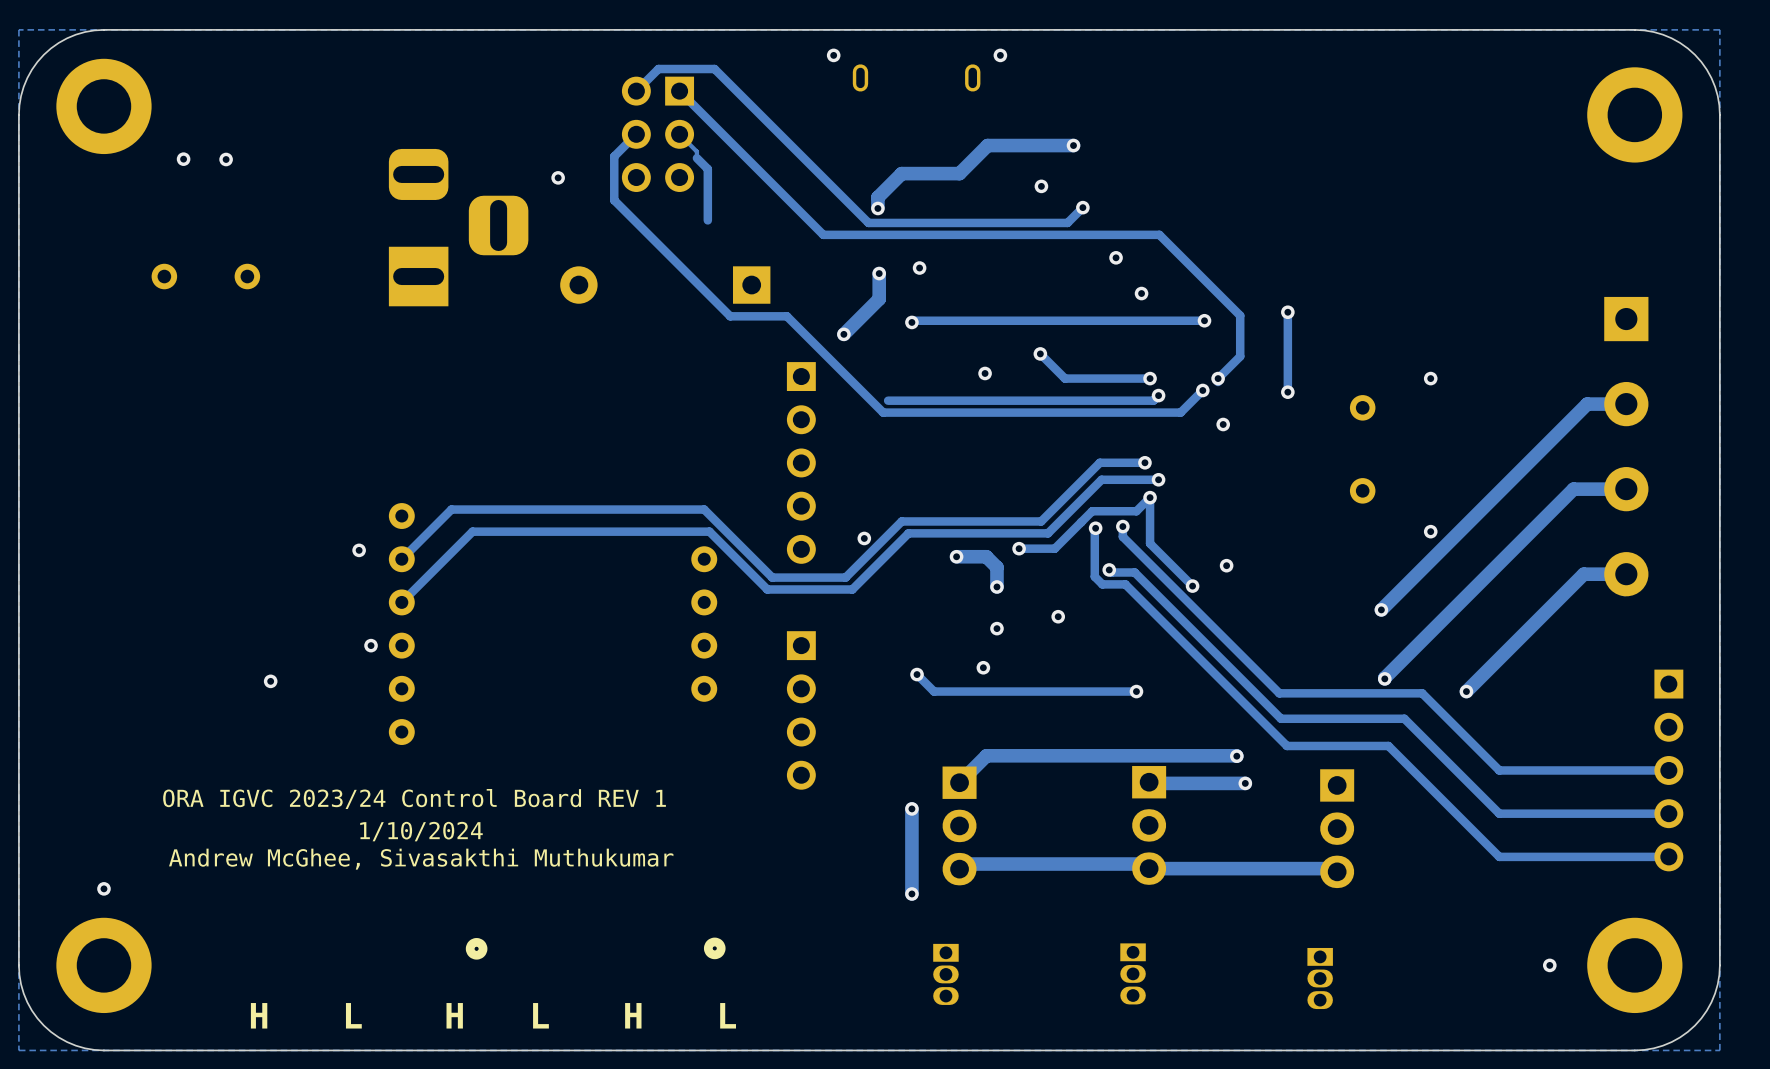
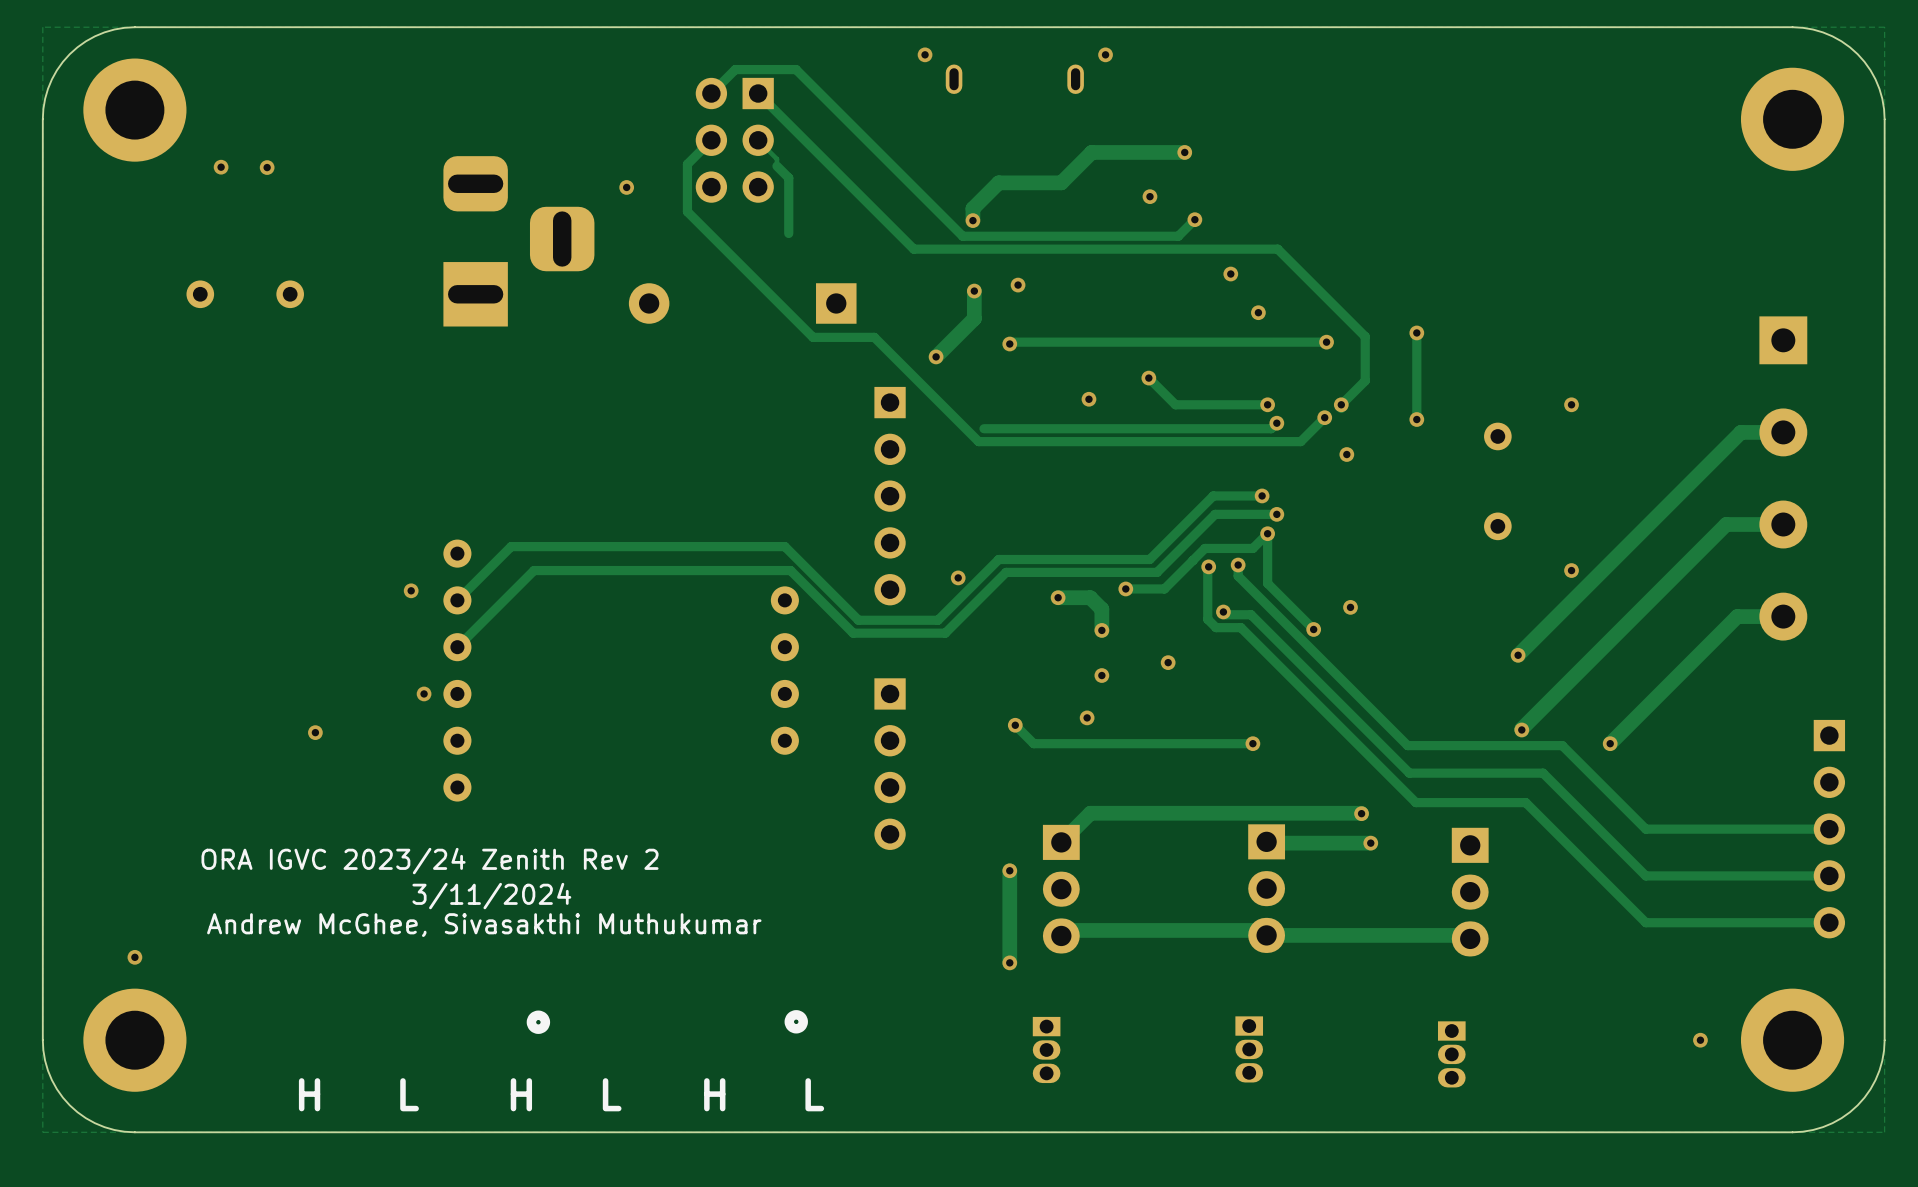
text: ORA IGVC 2023/24 Control Board REV 1 (414, 798) -> ORA IGVC 2023/24 Zenith Rev 2 (430, 861)
text: 1/10/2024 (421, 831) -> 3/11/2024 (491, 896)

